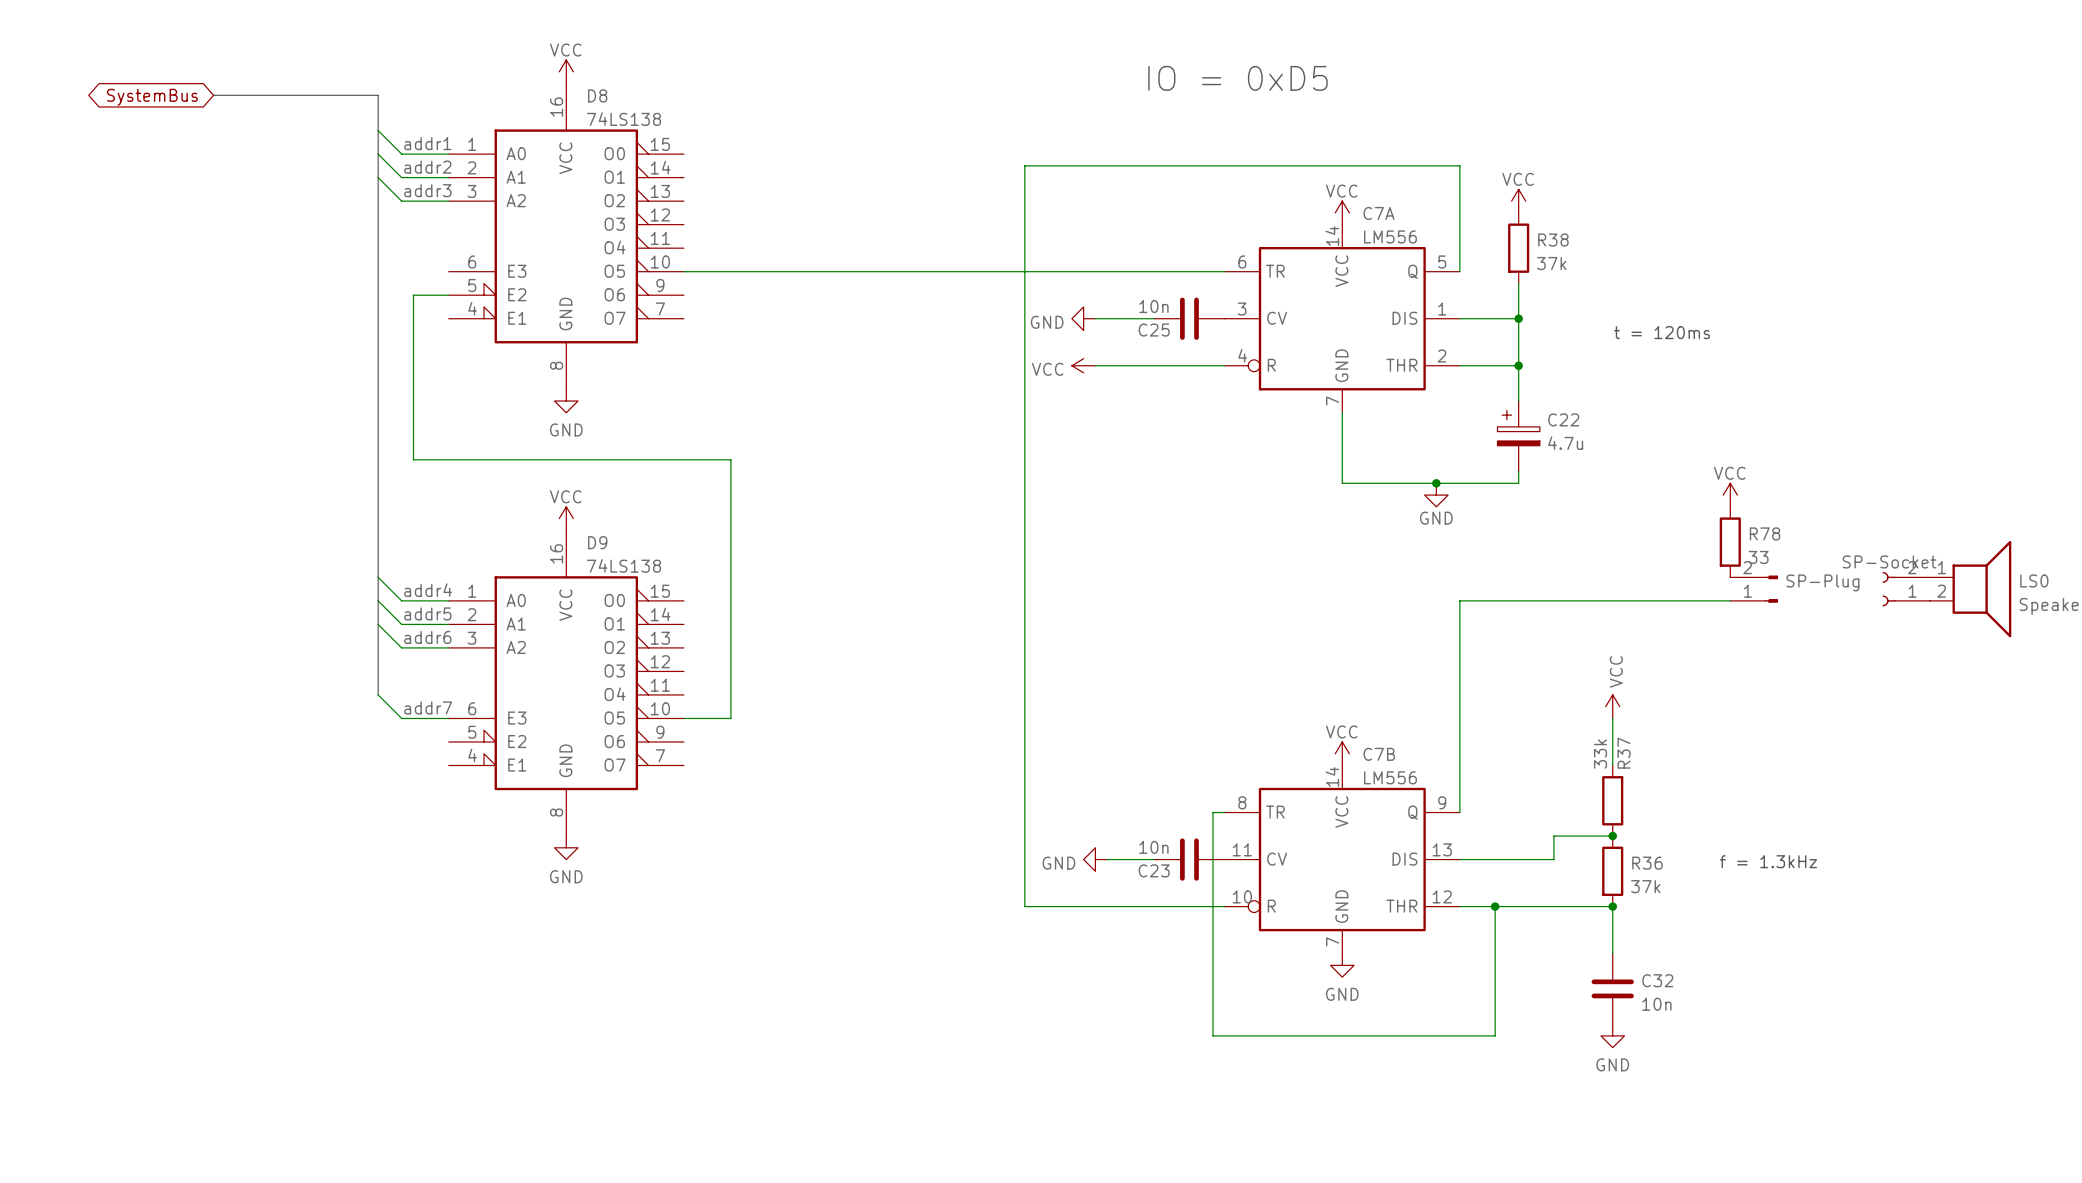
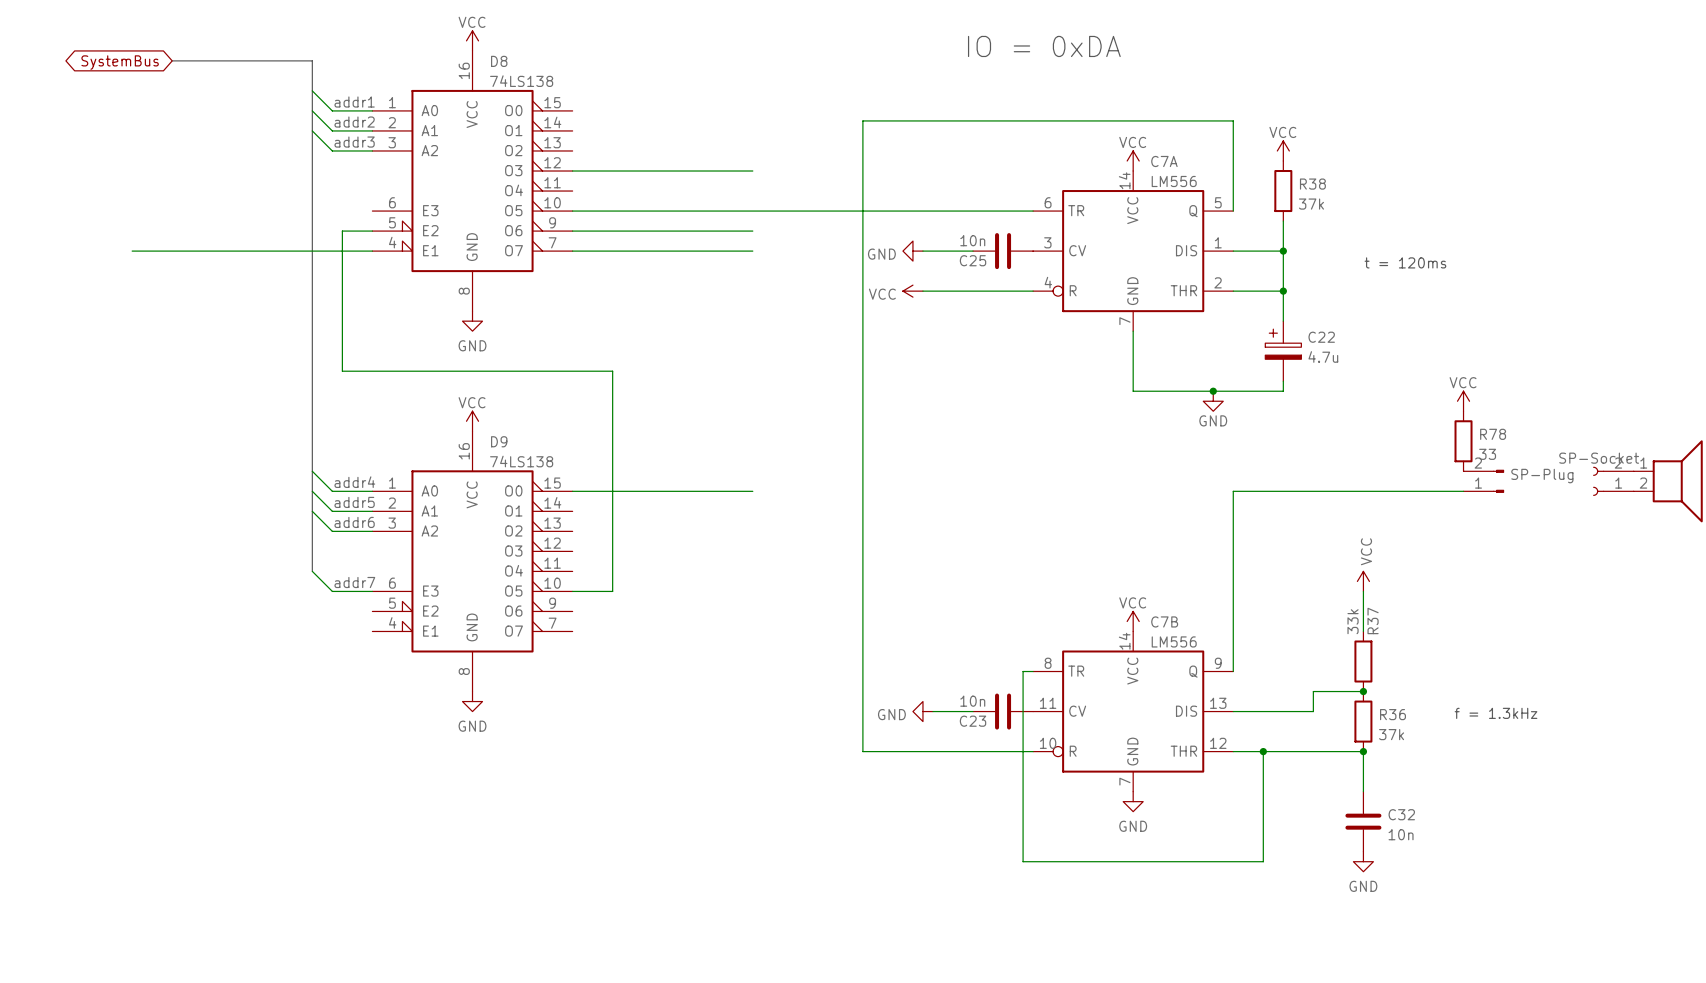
text: IO = 0xD5 (1237, 78) -> IO = 0xDA (1044, 46)
wire: none -> (572, 171) (752, 171)
wire: none -> (572, 231) (752, 231)
wire: none -> (132, 251) (372, 251)
wire: none -> (572, 251) (752, 251)
wire: none -> (572, 491) (752, 491)

